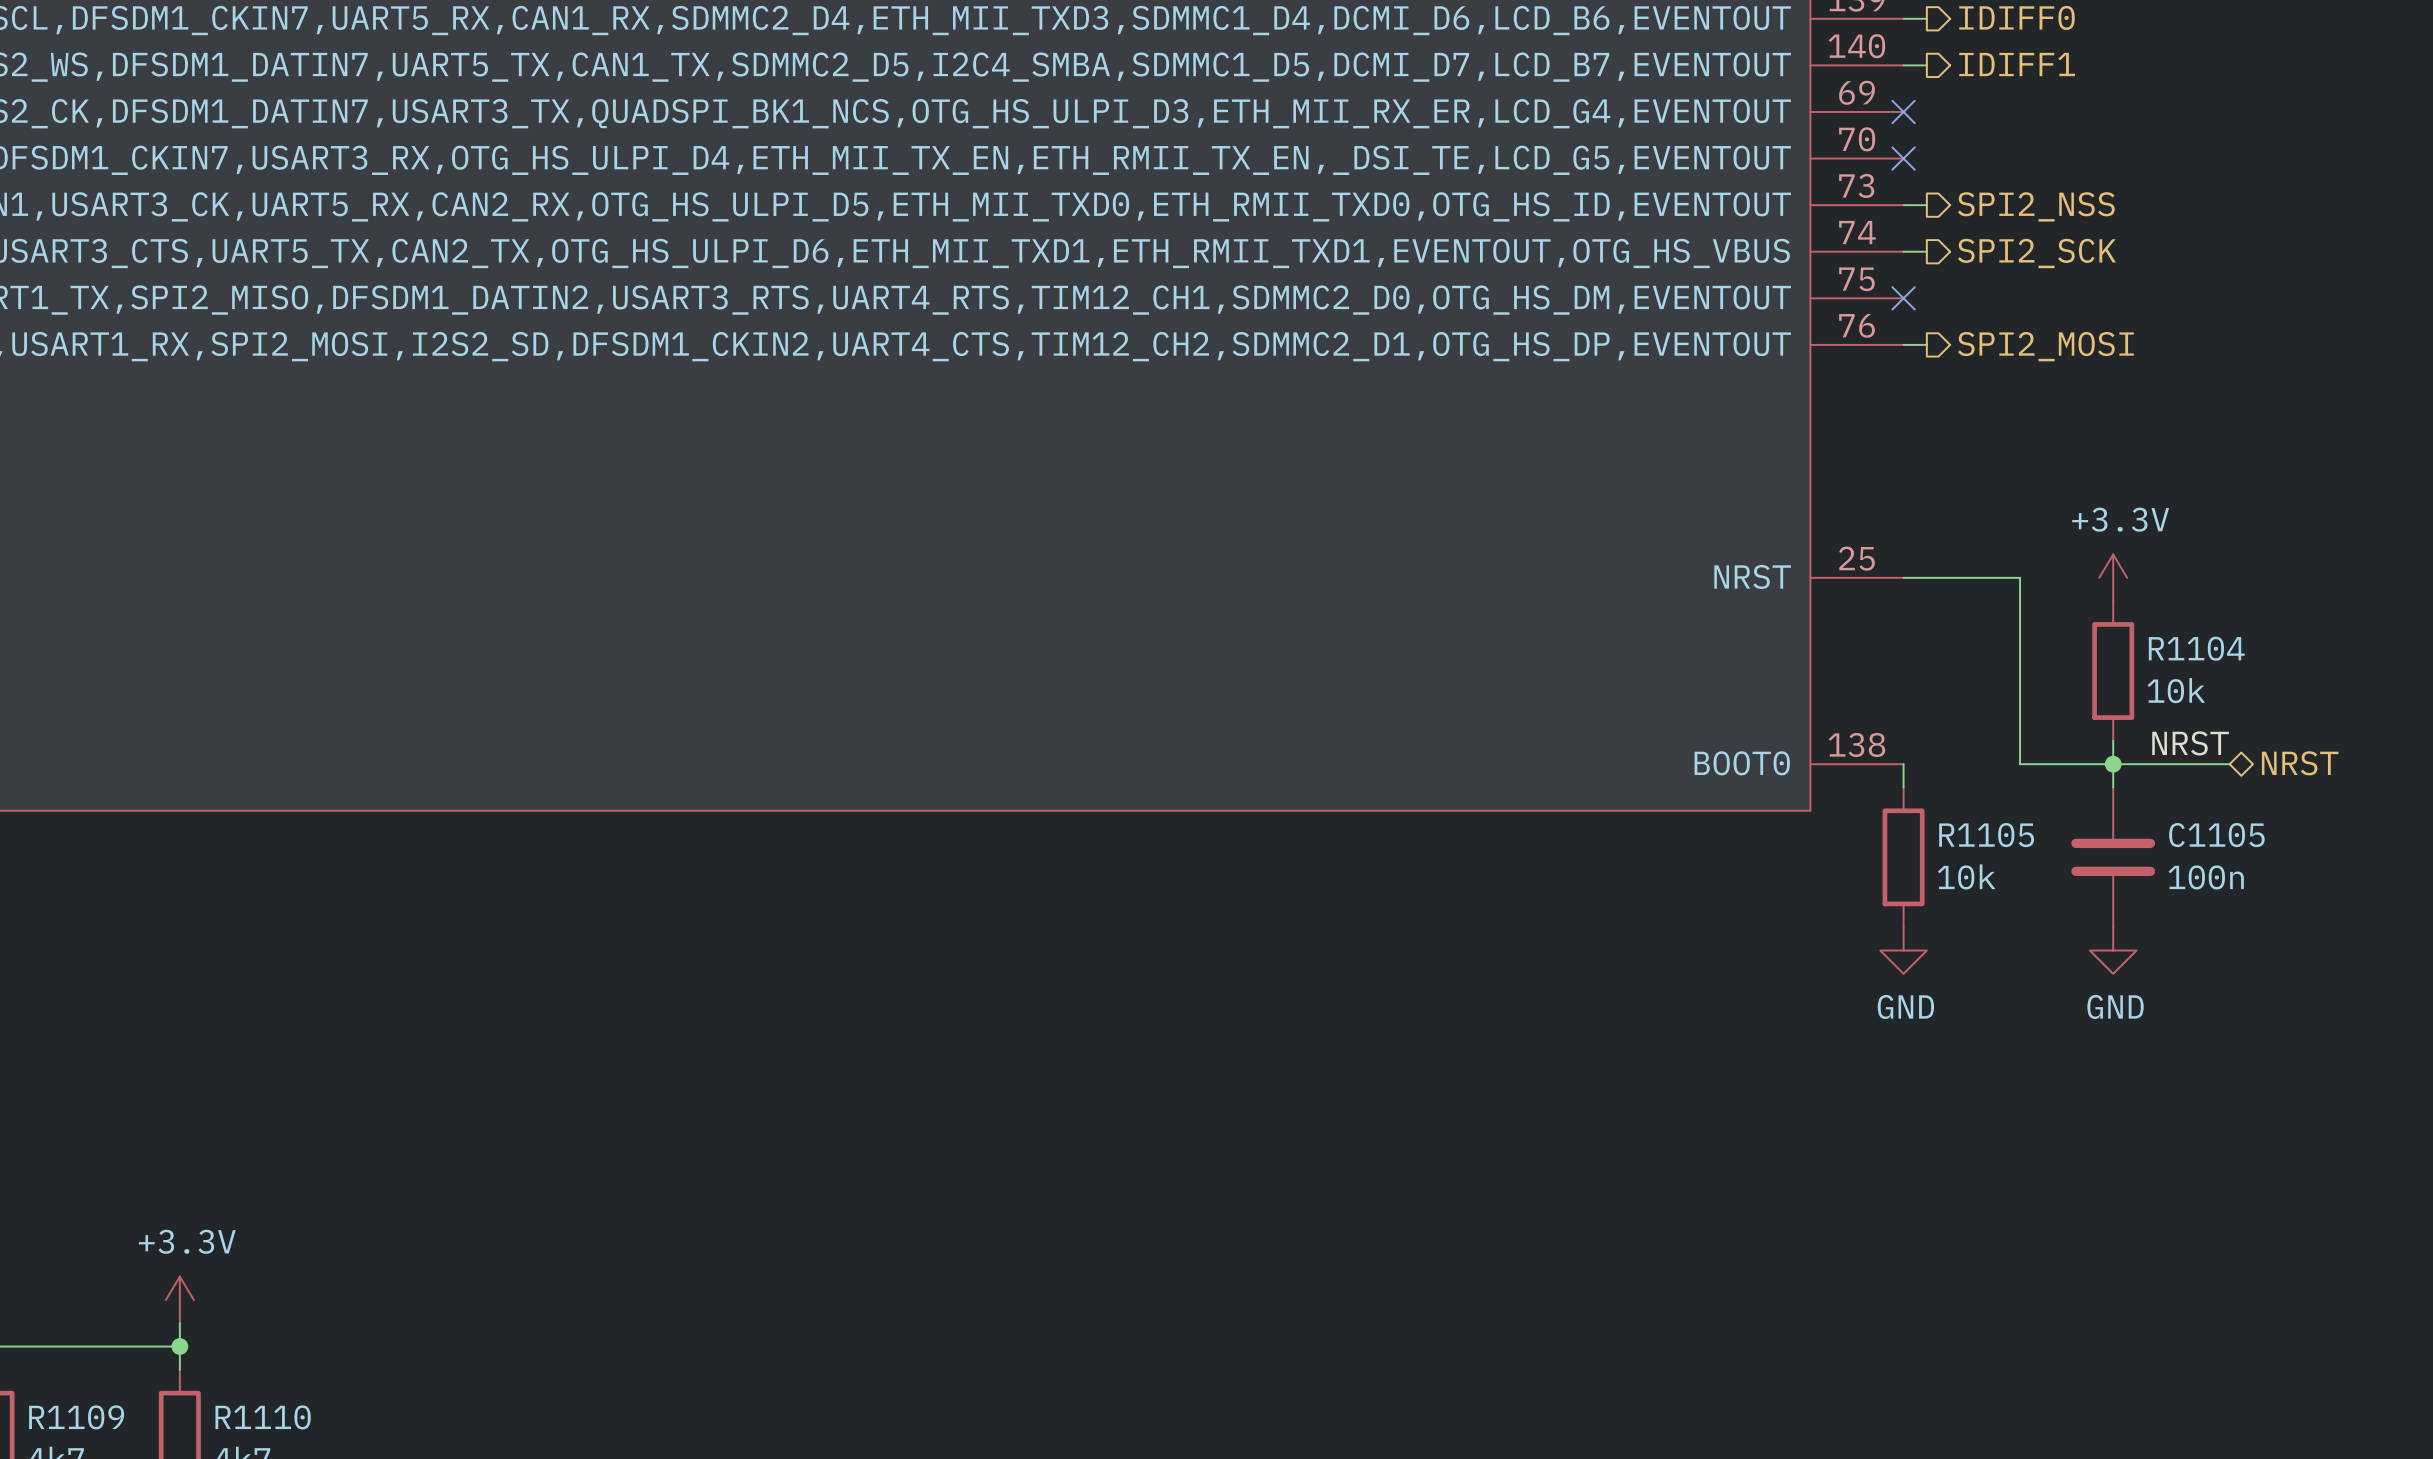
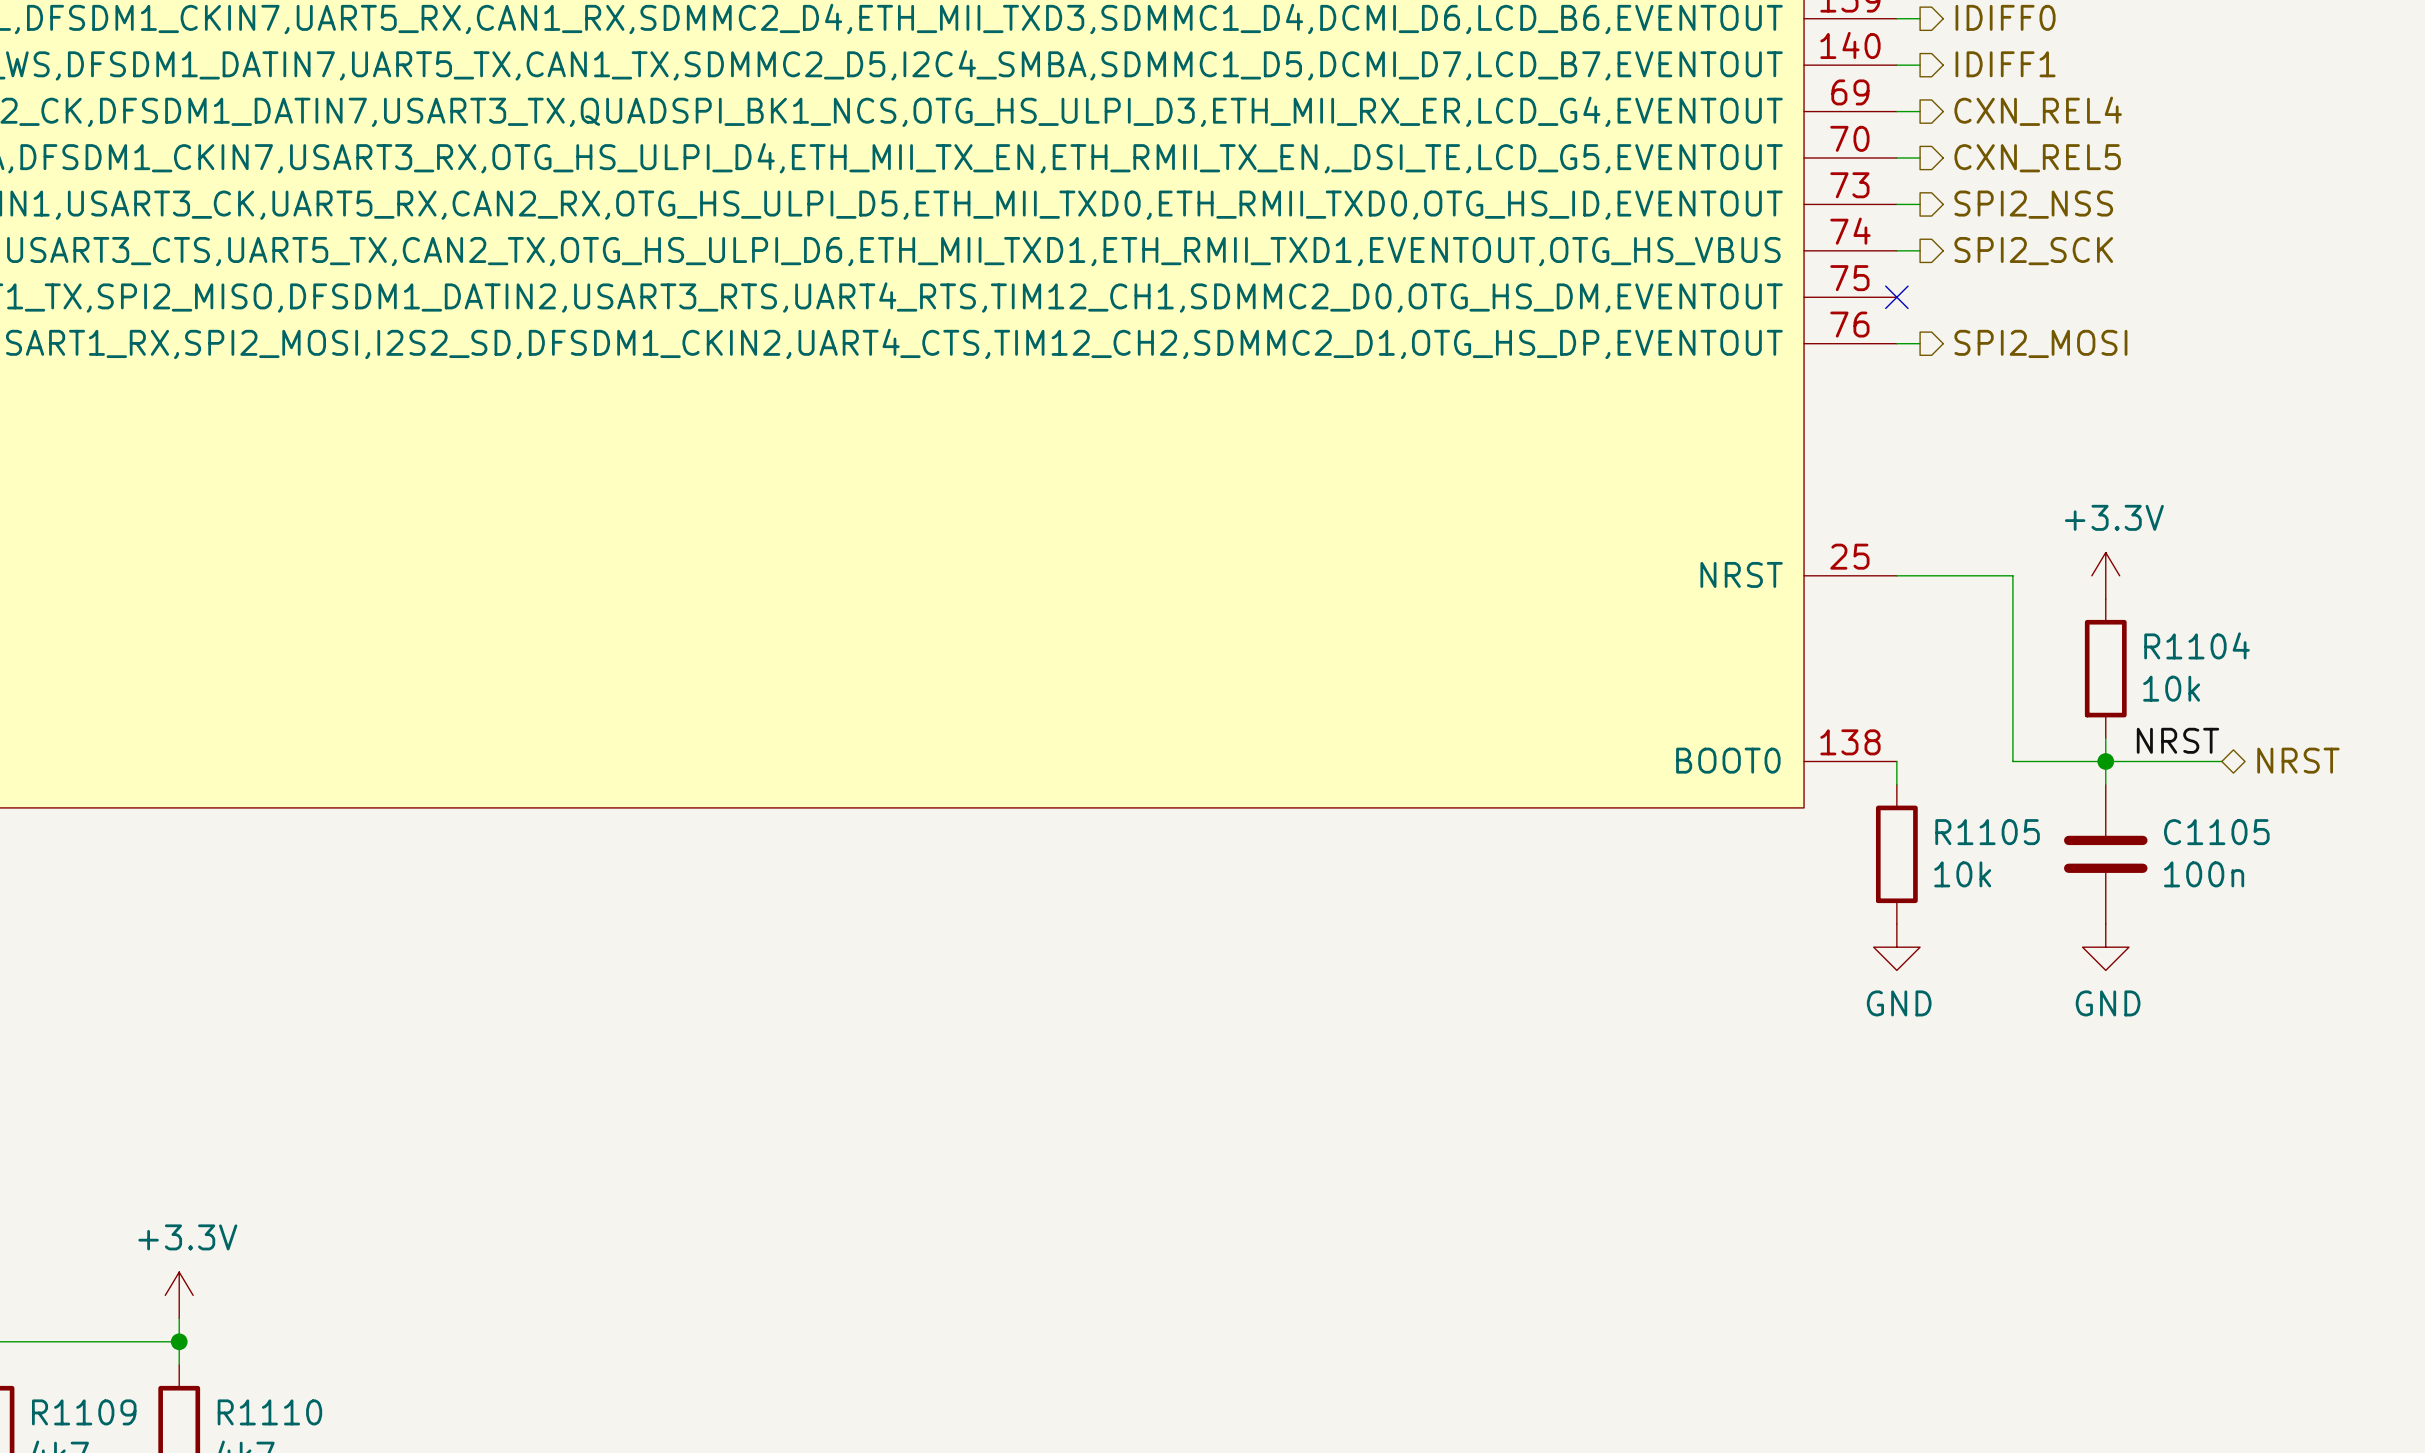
wire: none -> (1896, 111) (1920, 111)
no-connect mark: (1903, 111) -> none
hierarchical label: none -> CXN_REL4 (2038, 111)
wire: none -> (1896, 158) (1920, 158)
no-connect mark: (1903, 158) -> none
hierarchical label: none -> CXN_REL5 (2037, 158)

